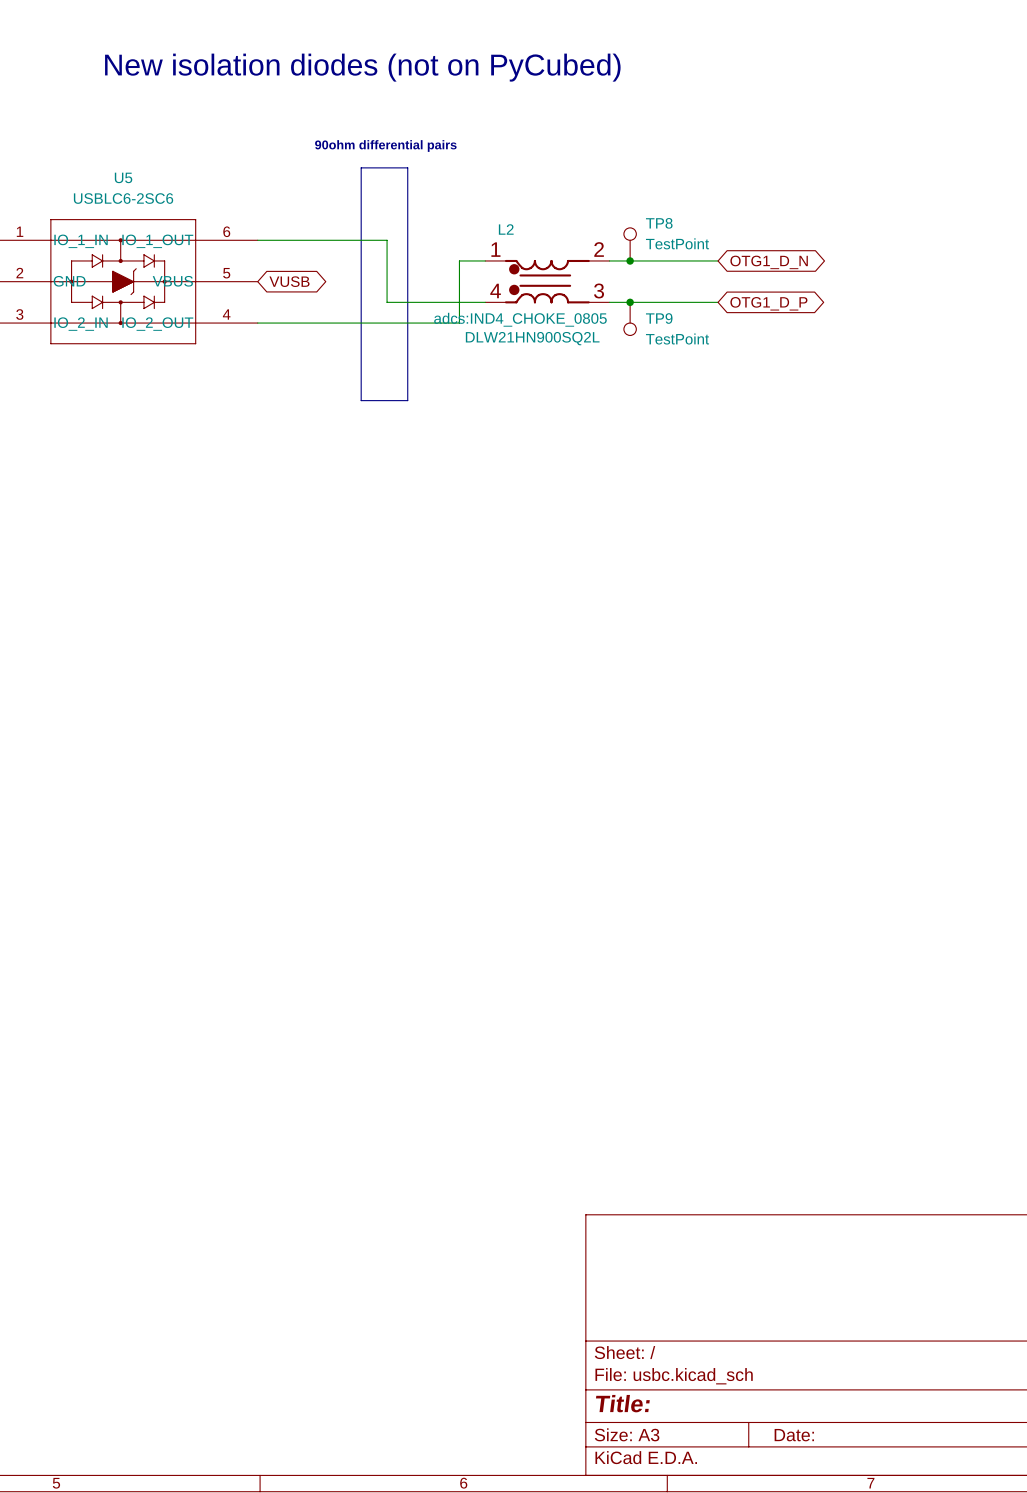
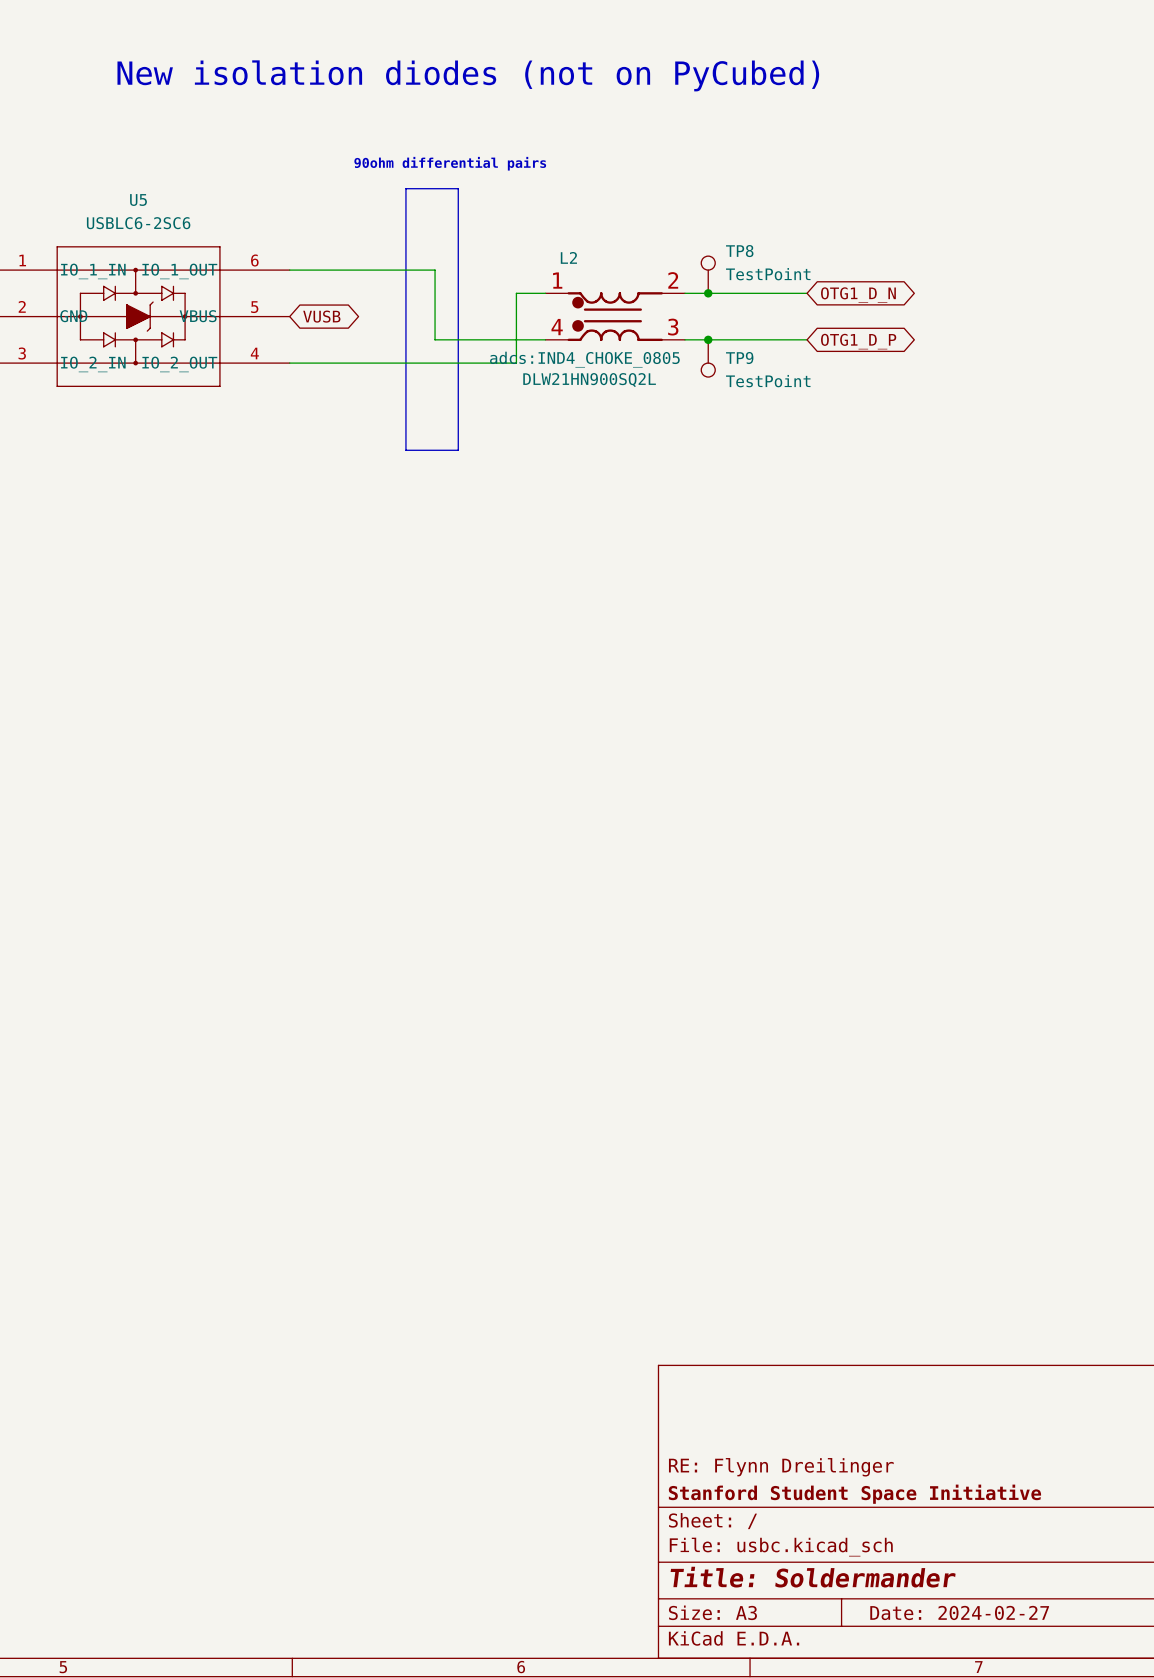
title block: none -> RE: Flynn Dreilinger (781, 1467)
title block: none -> Stanford Student Space Initiative (854, 1494)
title block: Title: (622, 1403) -> Title: Soldermander (813, 1577)
title block: Date: (794, 1435) -> Date: 2024-02-27 (959, 1612)

